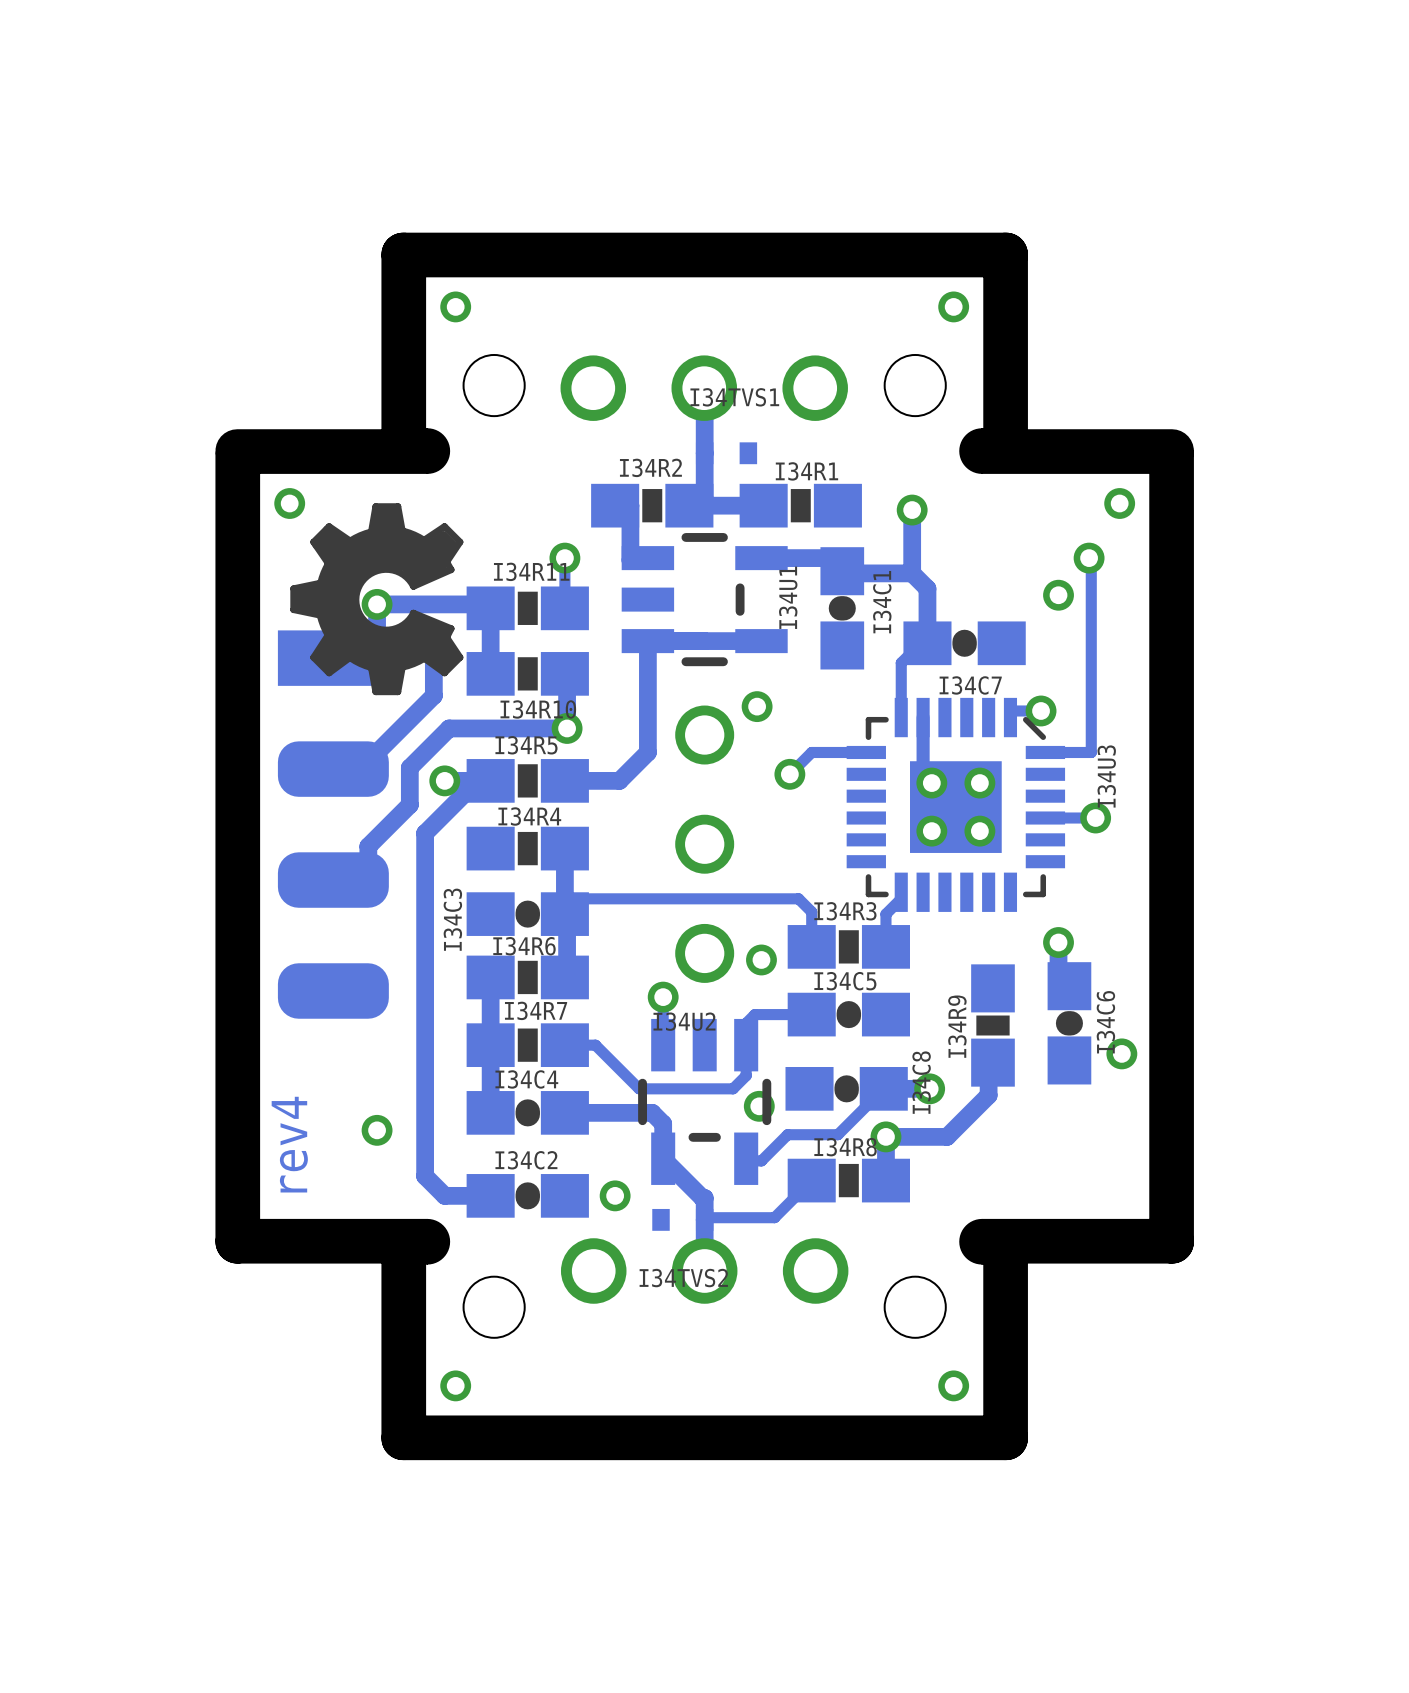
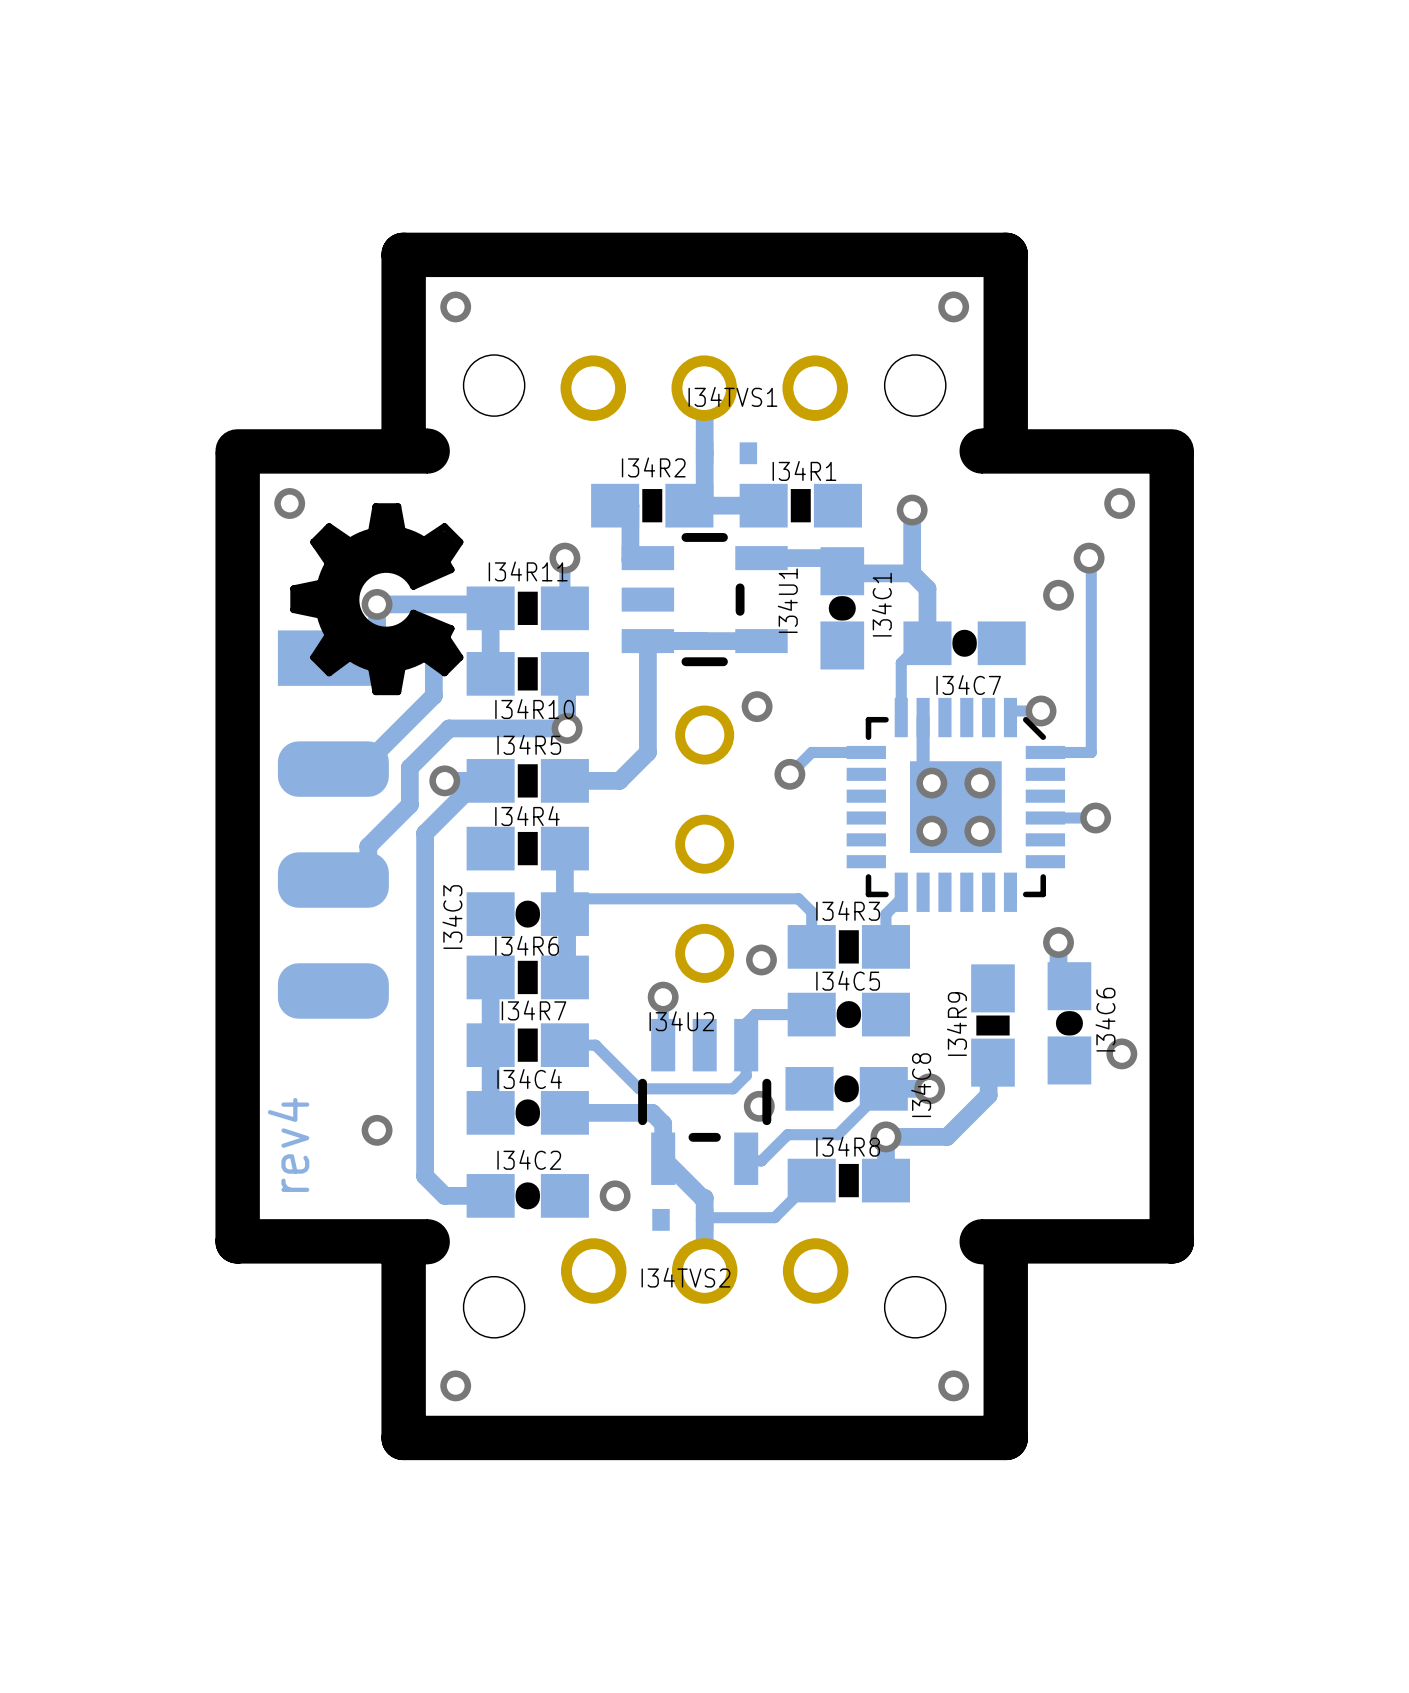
I34U3 name: I34U3 (1106, 776) -> none

